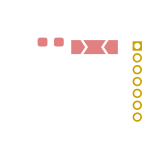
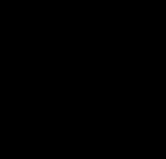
part: (50, 42) -> none
part: (94, 47) -> none
part: (137, 81) -> none

